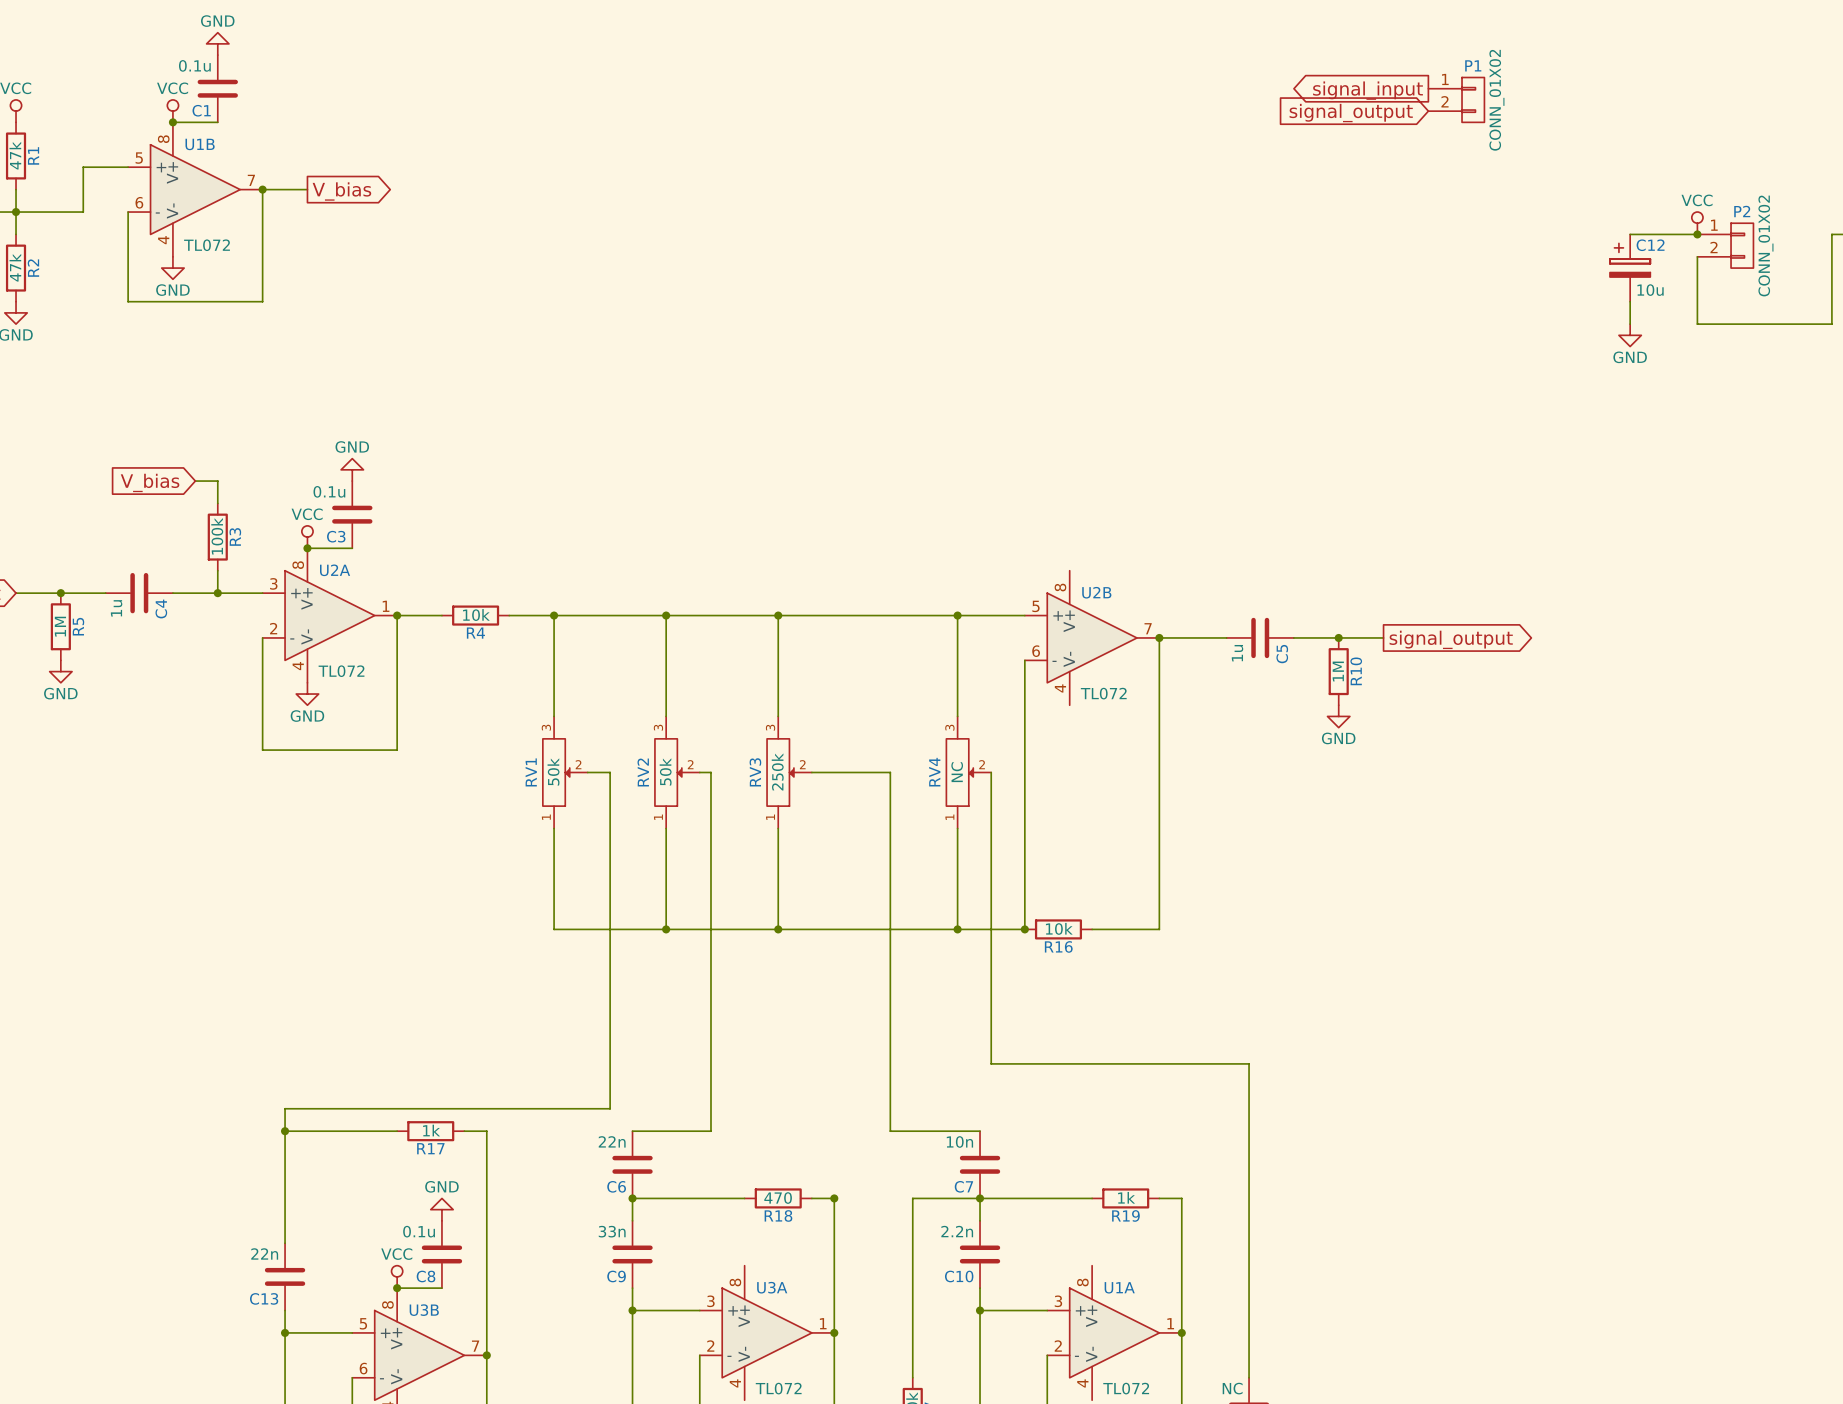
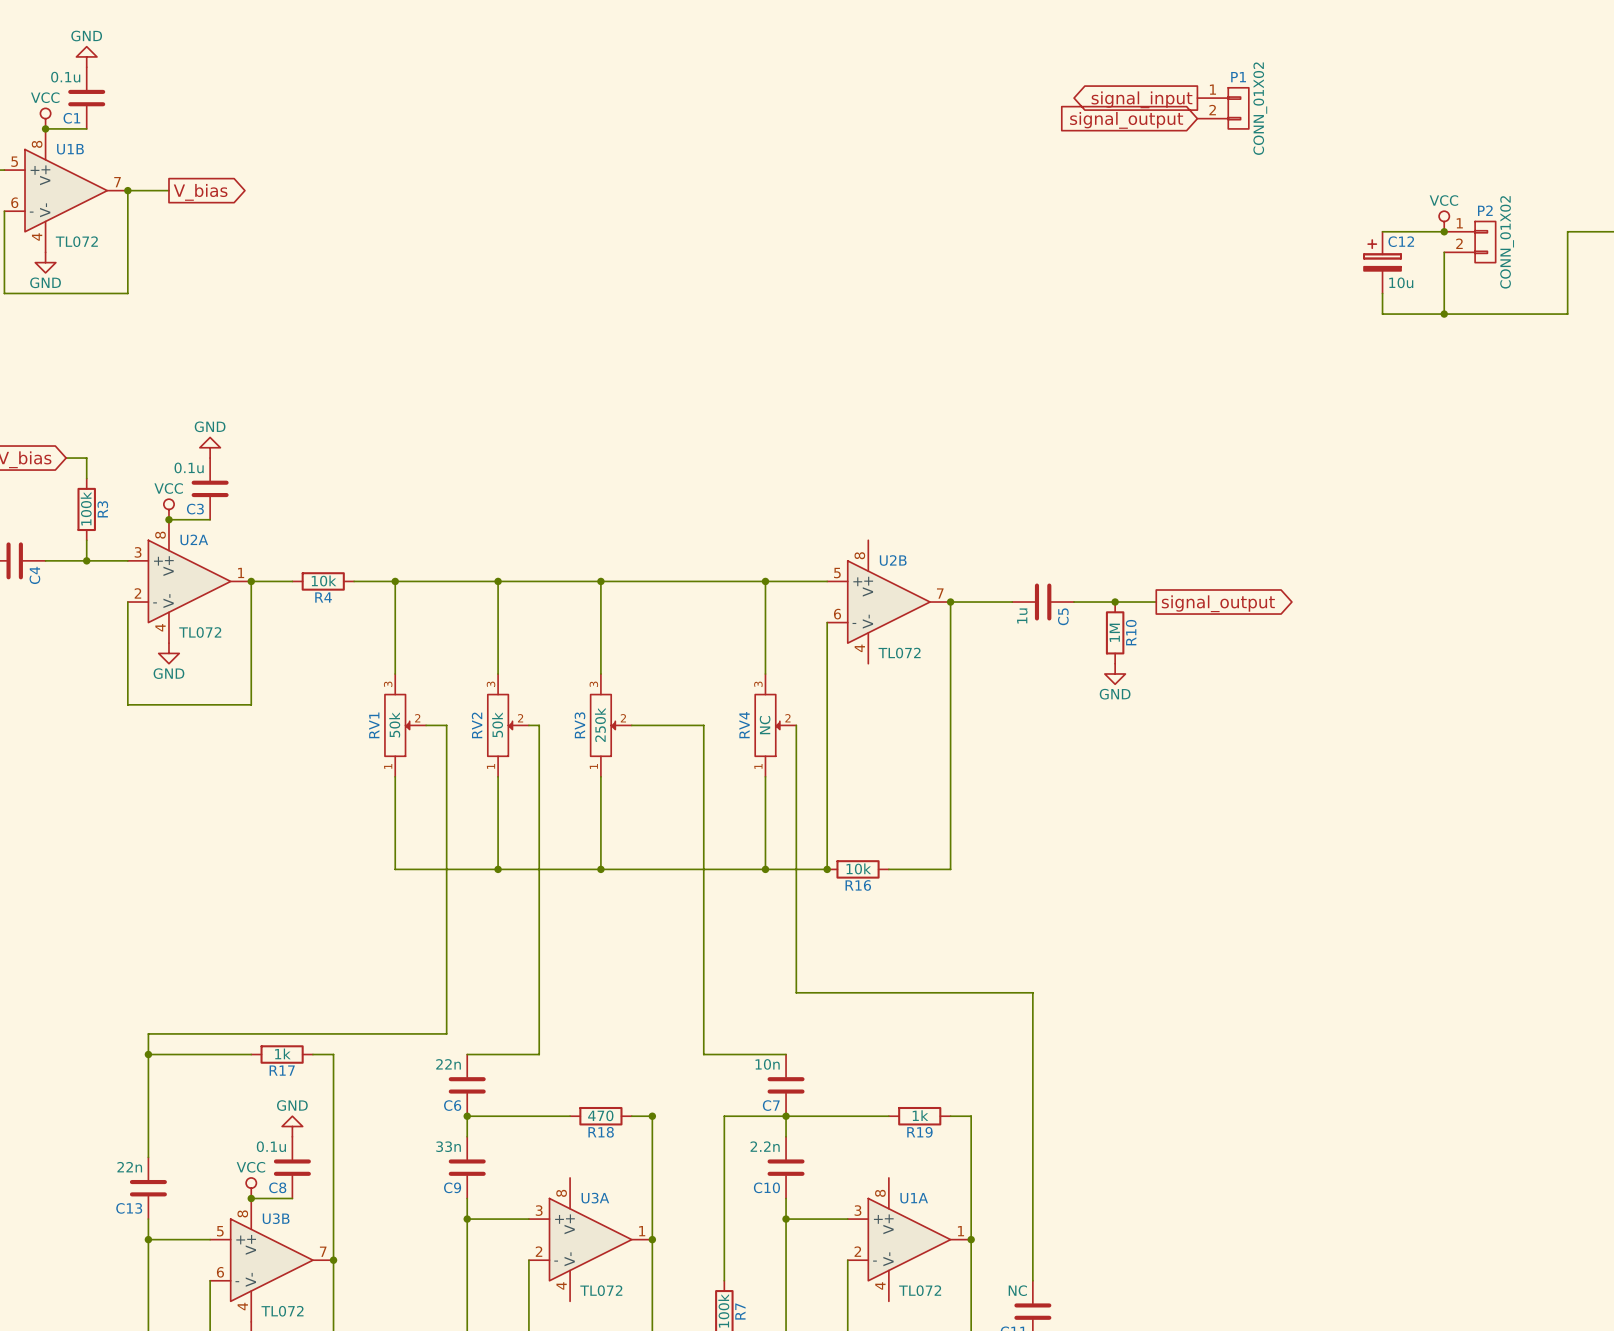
wire: none -> (1382, 314) (1444, 314)
junction: none -> (1444, 314)
power symbol: GND (1630, 335) -> none

